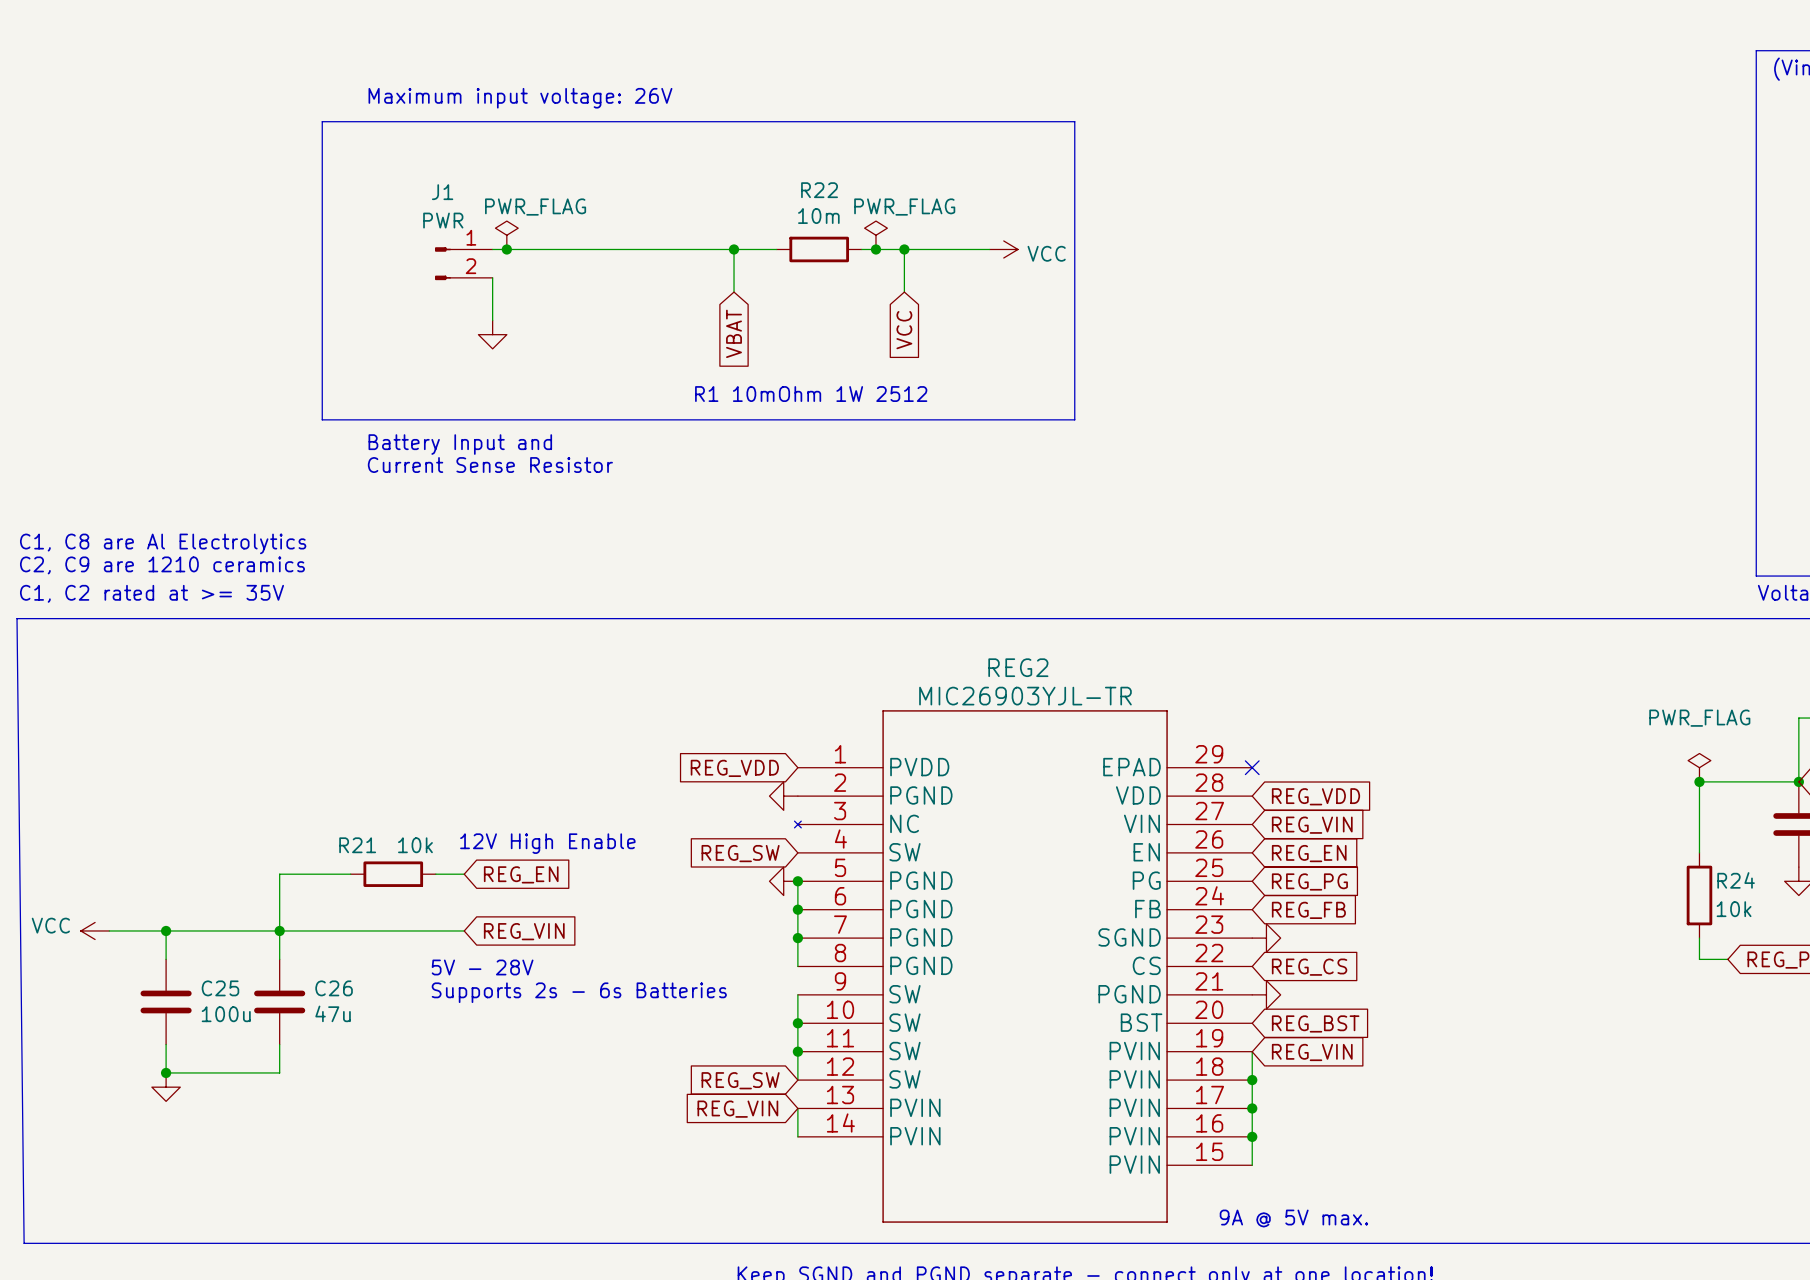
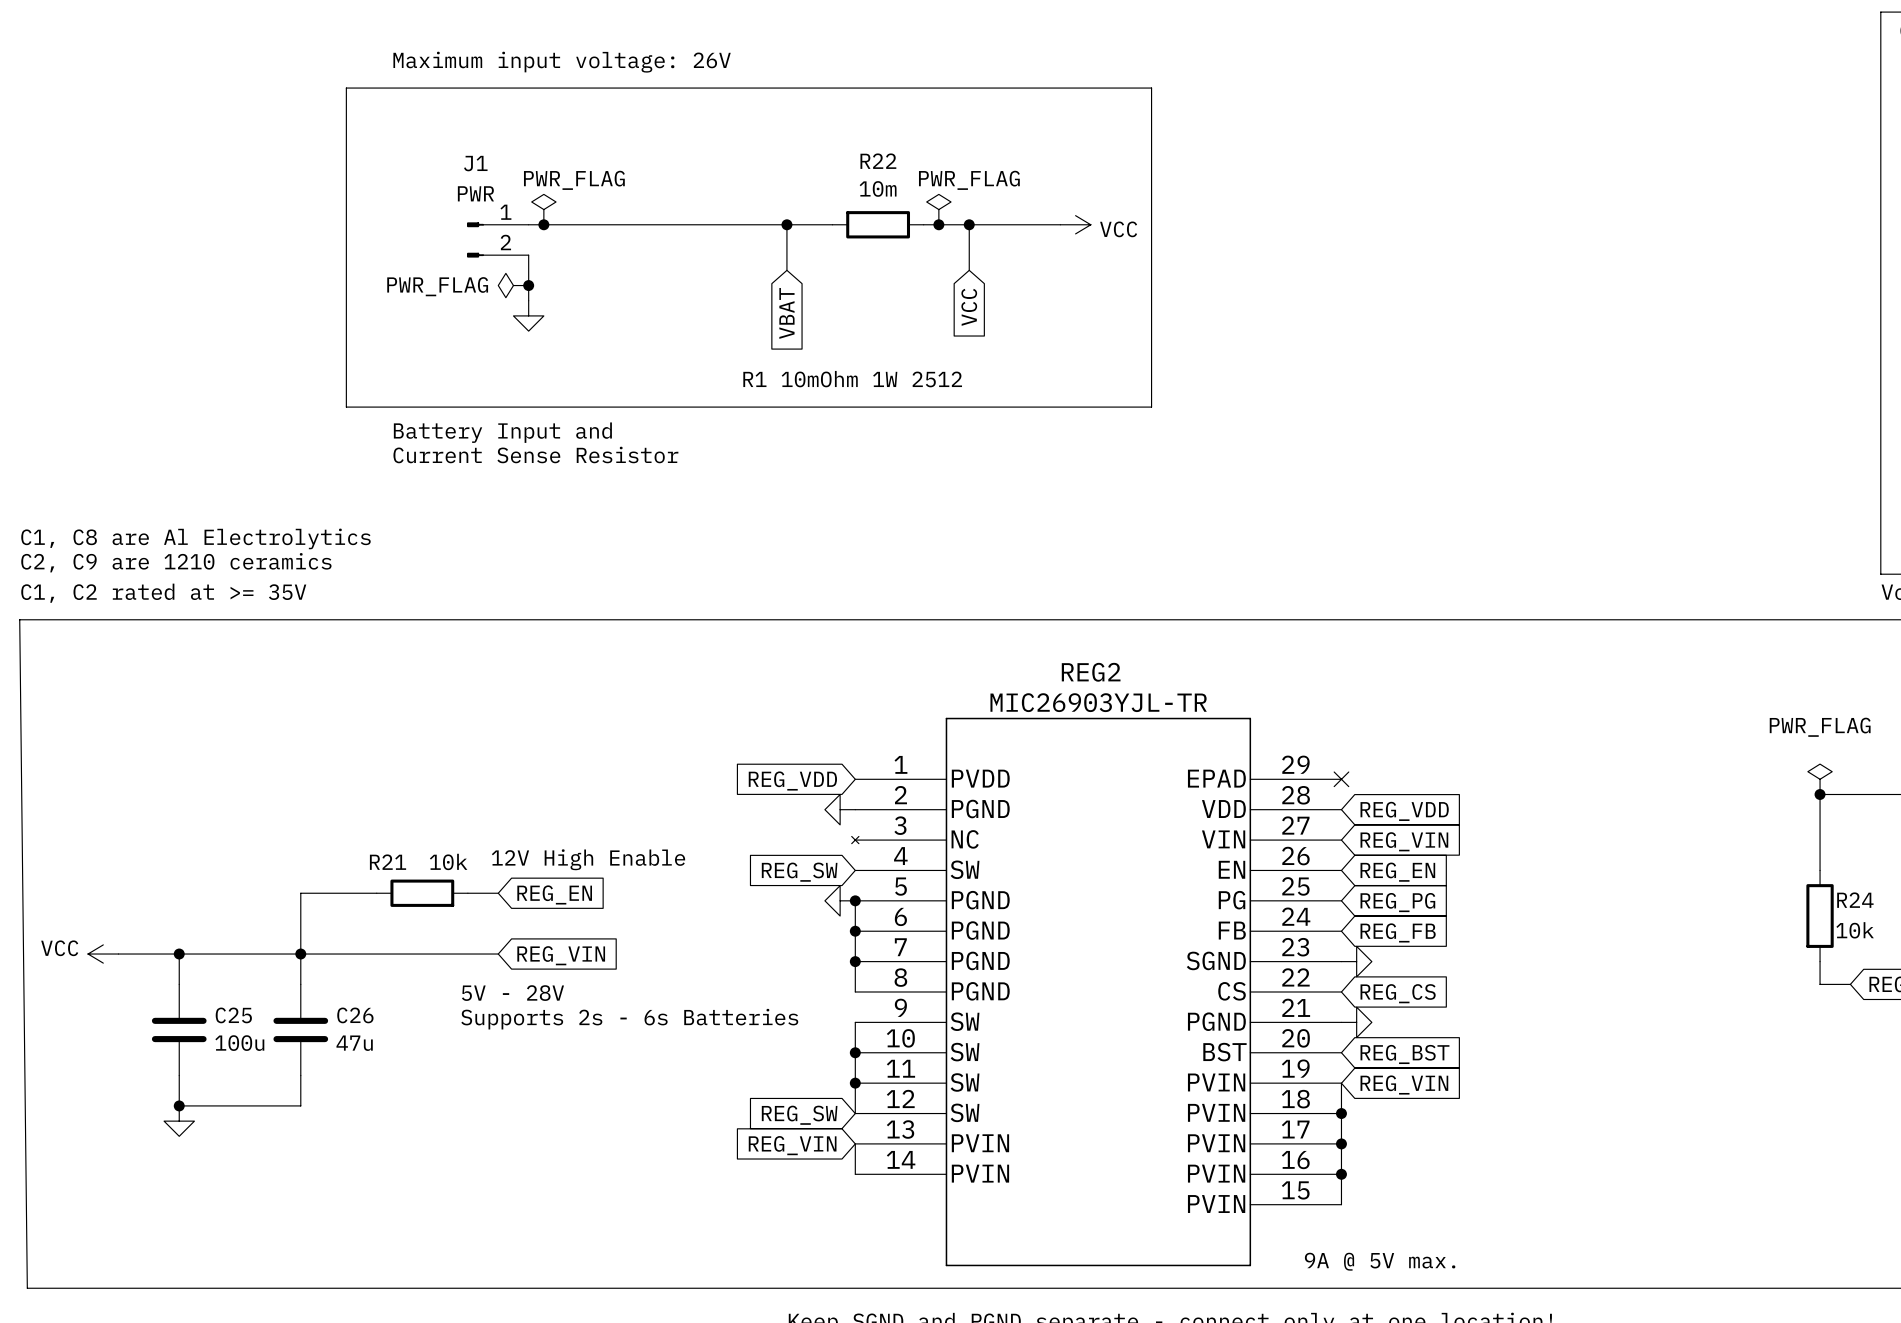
power symbol: none -> PWR_FLAG (513, 285)
junction: none -> (528, 285)

